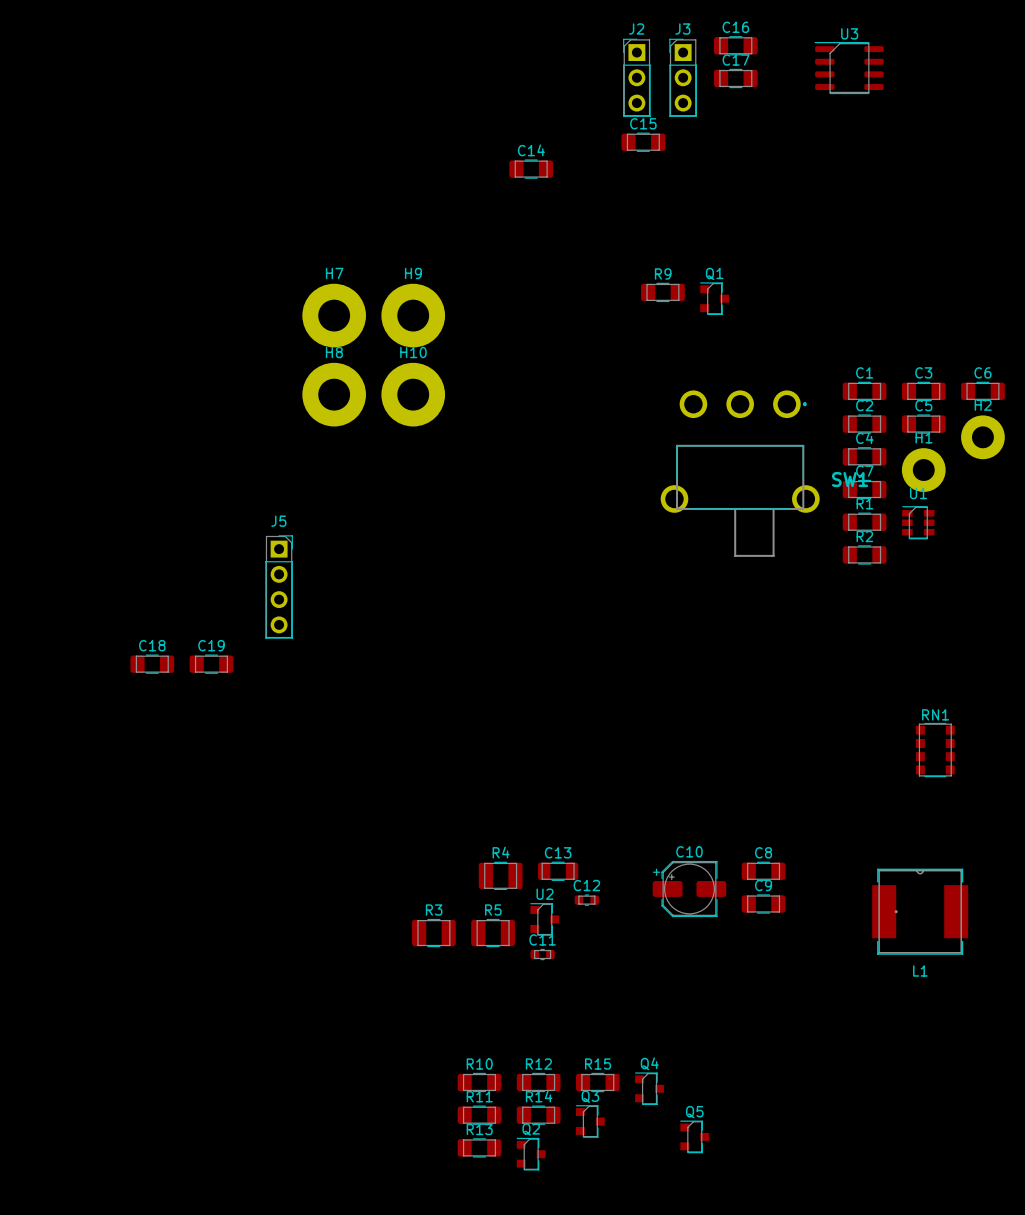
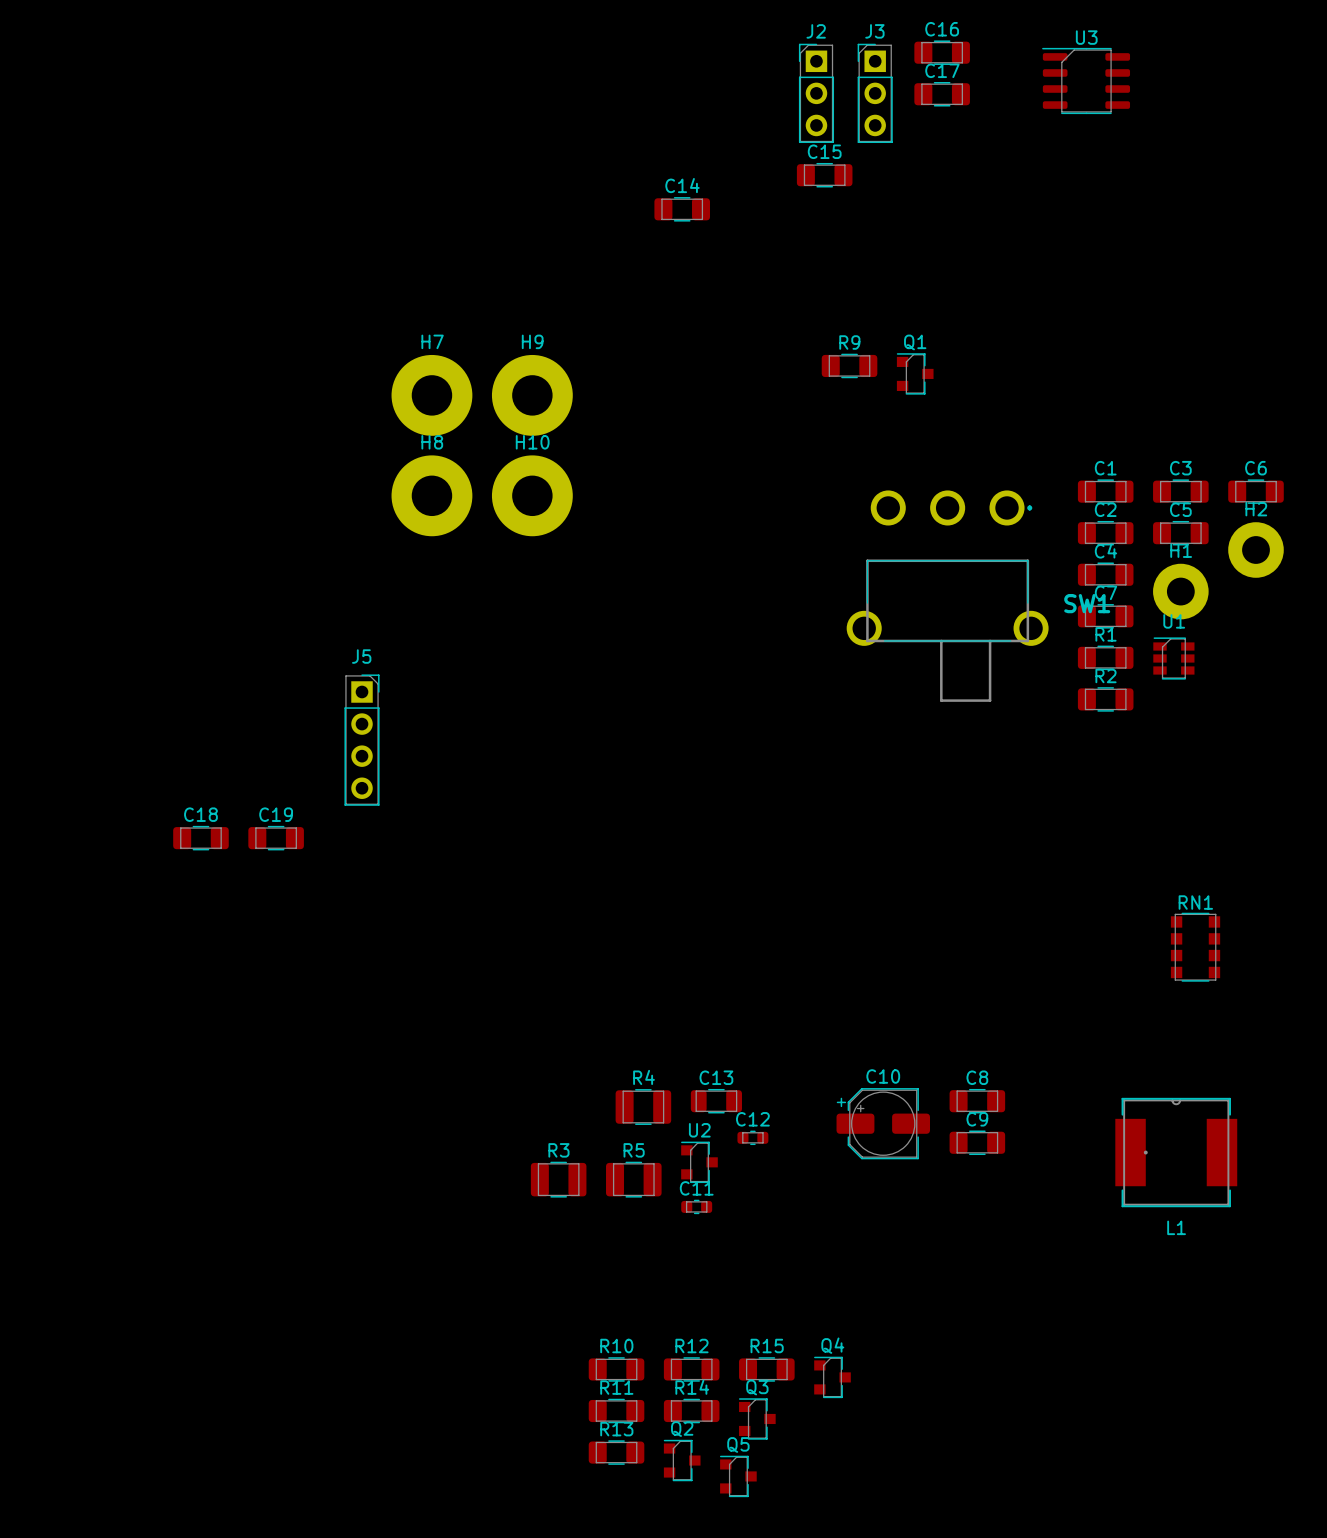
Q5 position: (694, 1136) -> (738, 1476)

